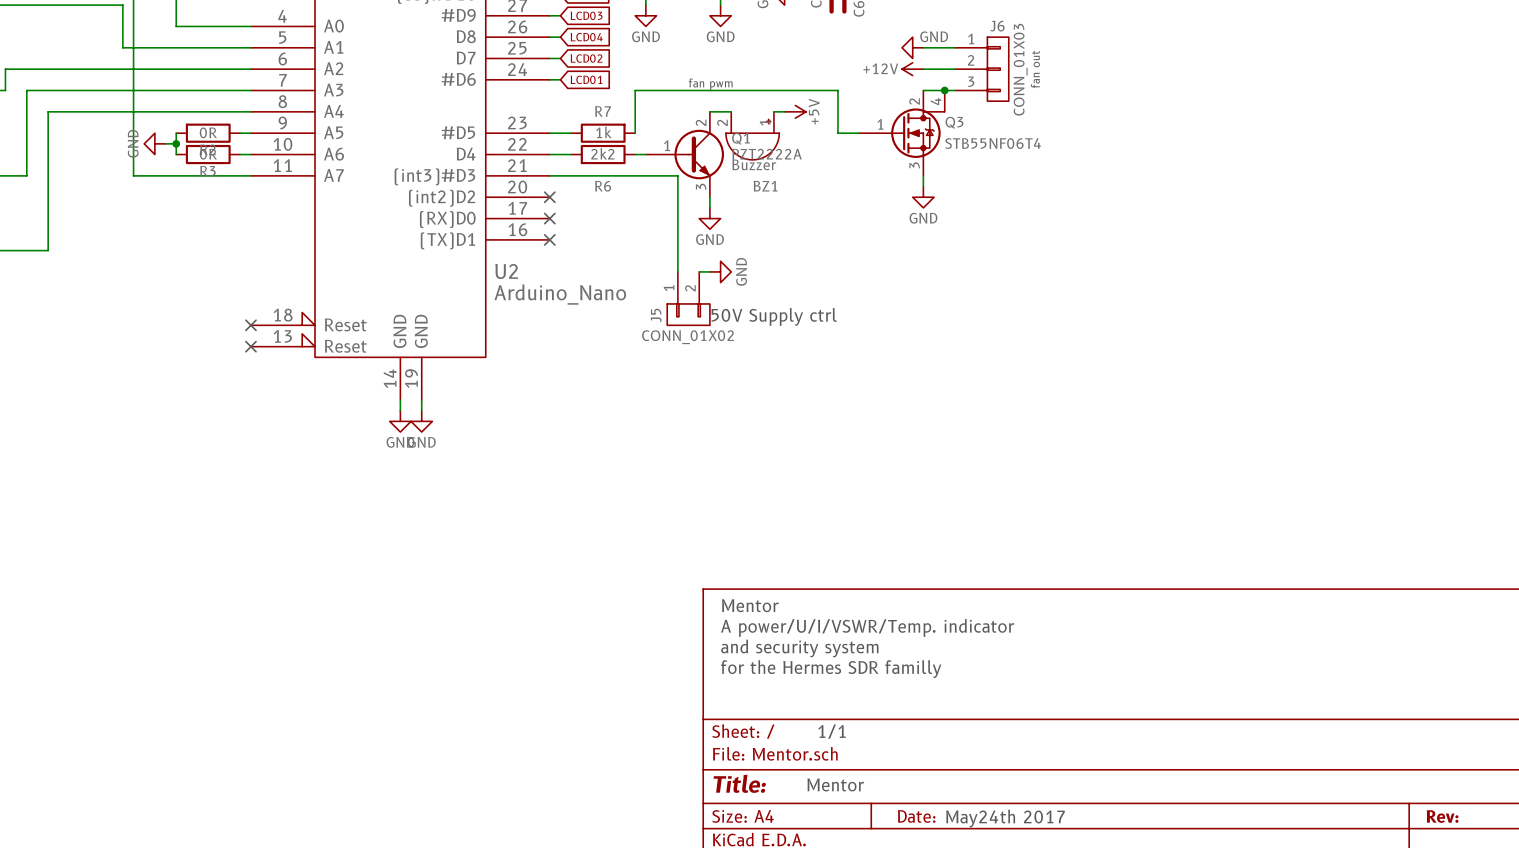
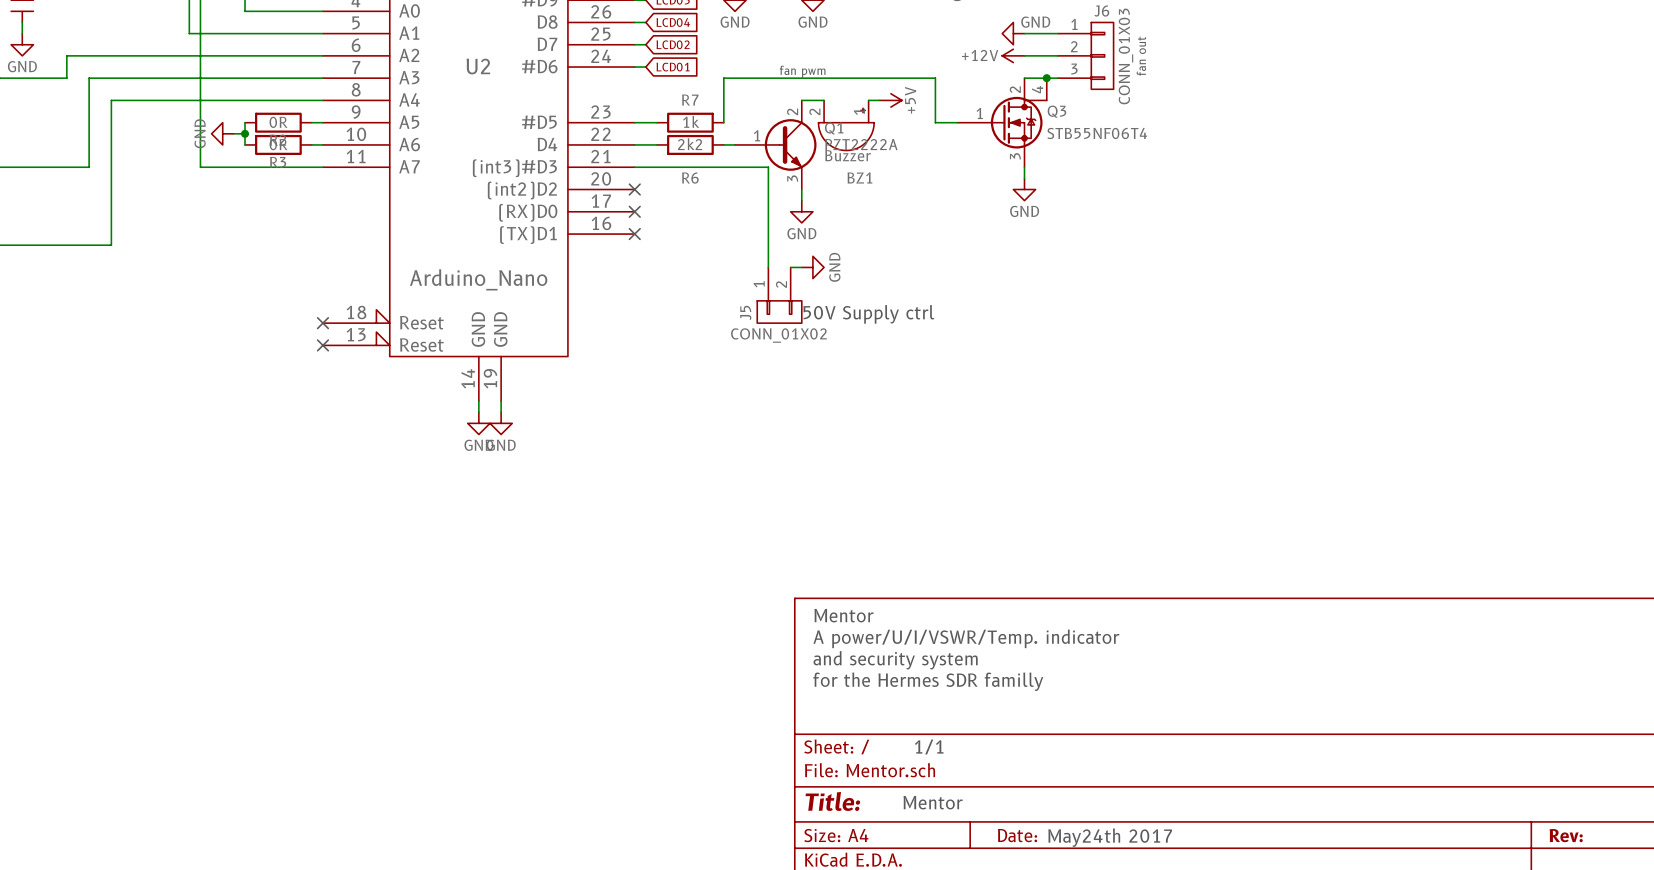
U2 name position: U2 (506, 271) -> U2 (478, 66)
U2 value position: Arduino_Nano (560, 294) -> Arduino_Nano (478, 279)

